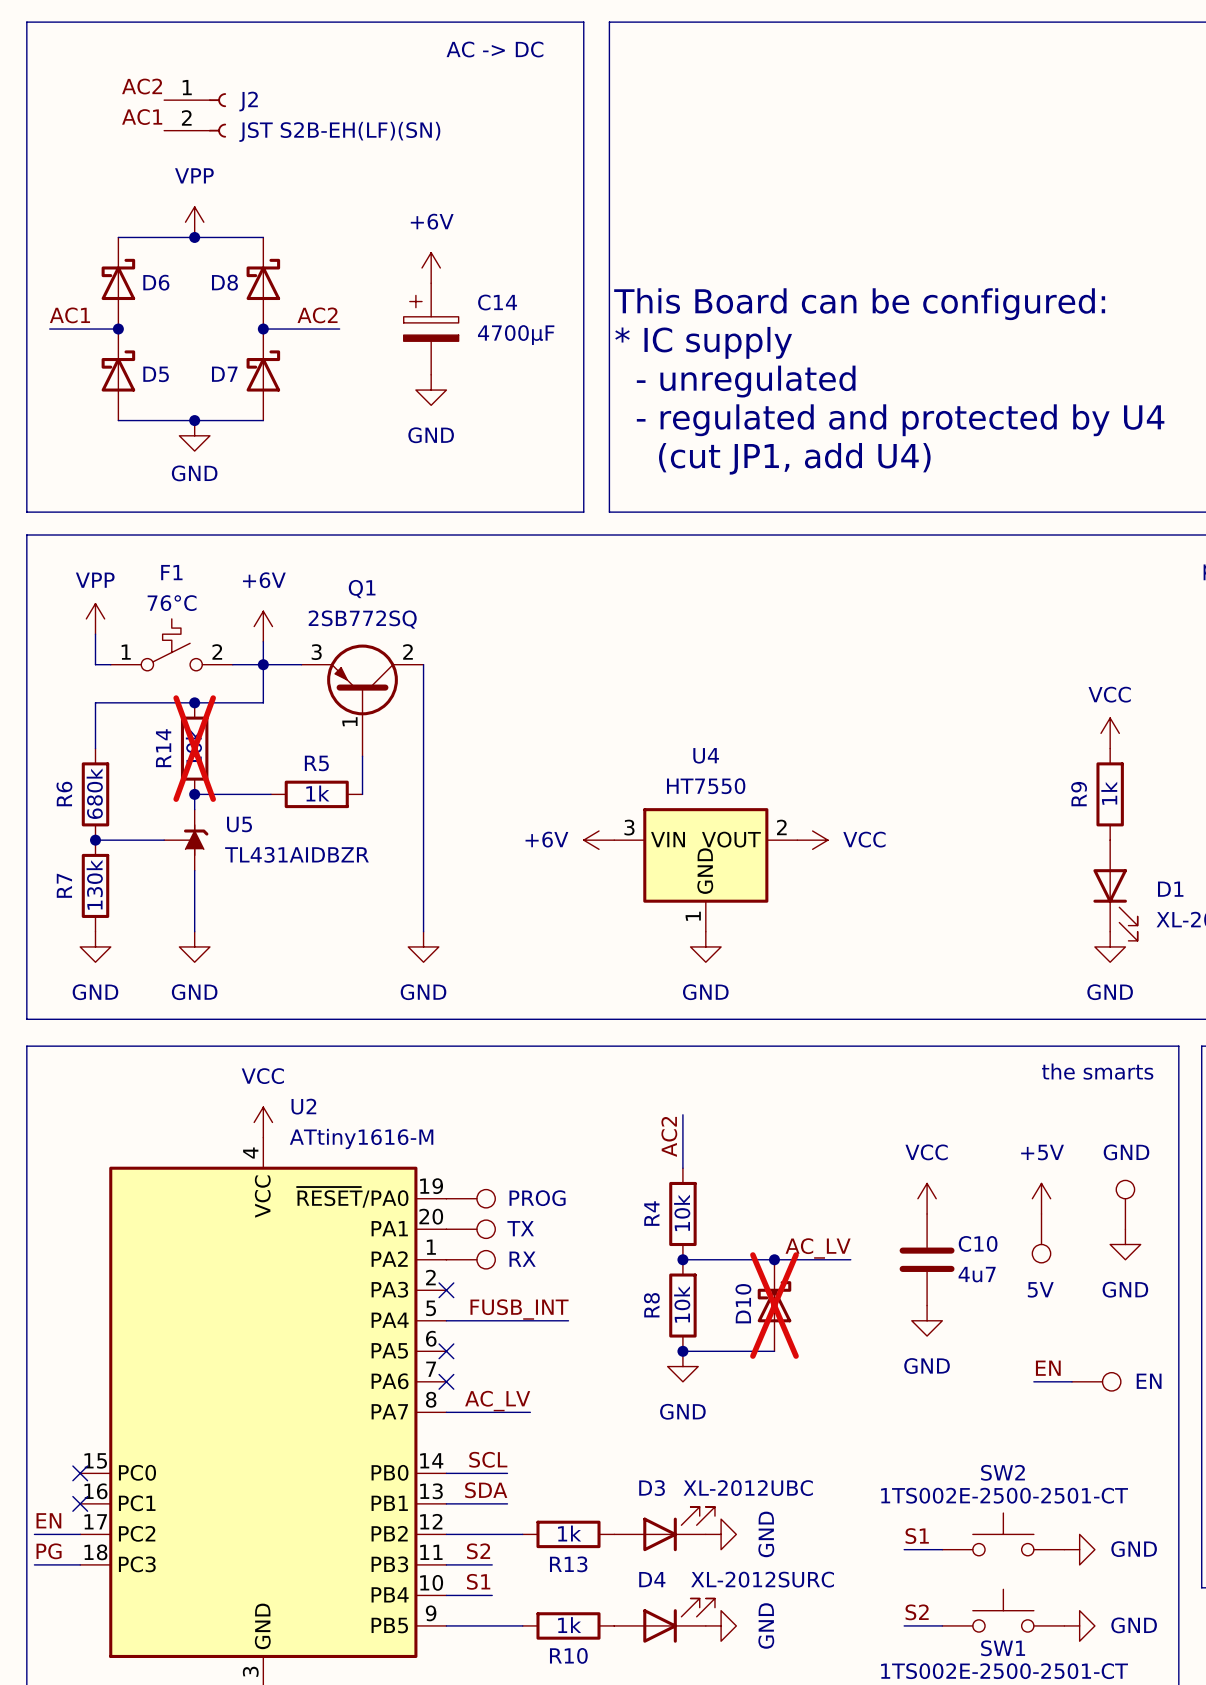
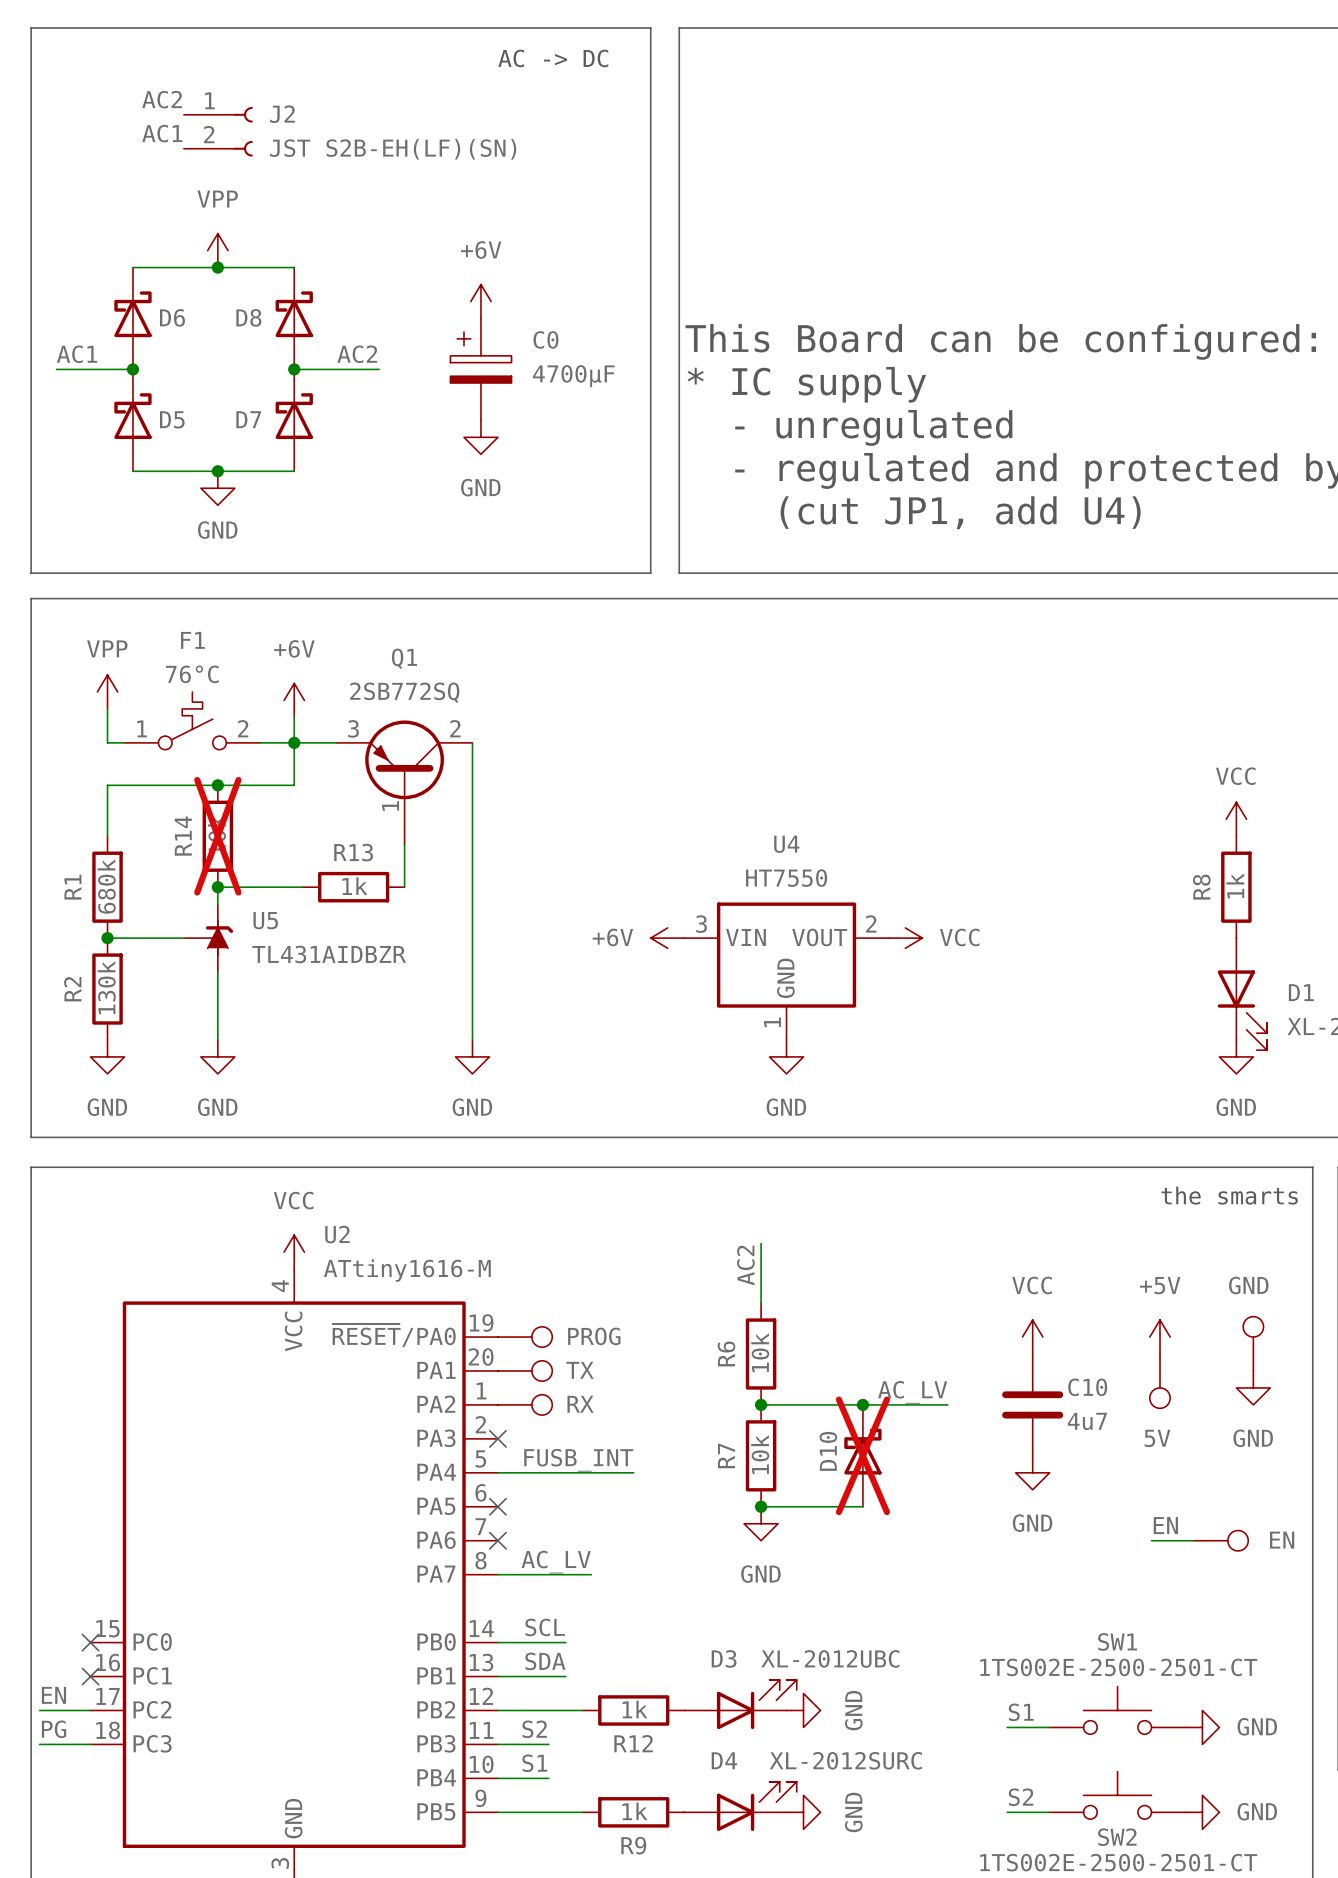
C14 name: C14 (497, 302) -> C0 (545, 339)
R5 name: R5 (316, 763) -> R13 (353, 852)
R6 name: R6 (64, 794) -> R1 (72, 887)
R9 name: R9 (1079, 794) -> R8 (1201, 887)
R7 name: R7 (64, 885) -> R2 (72, 989)
R4 name: R4 (651, 1213) -> R6 (726, 1353)
R8 name: R8 (651, 1305) -> R7 (726, 1455)
SW2 name: SW2 (1003, 1472) -> SW1 (1117, 1641)
R13 name: R13 (568, 1564) -> R12 (633, 1743)
SW1 name: SW1 (1003, 1648) -> SW2 (1117, 1837)
R10 name: R10 (568, 1655) -> R9 (633, 1845)

